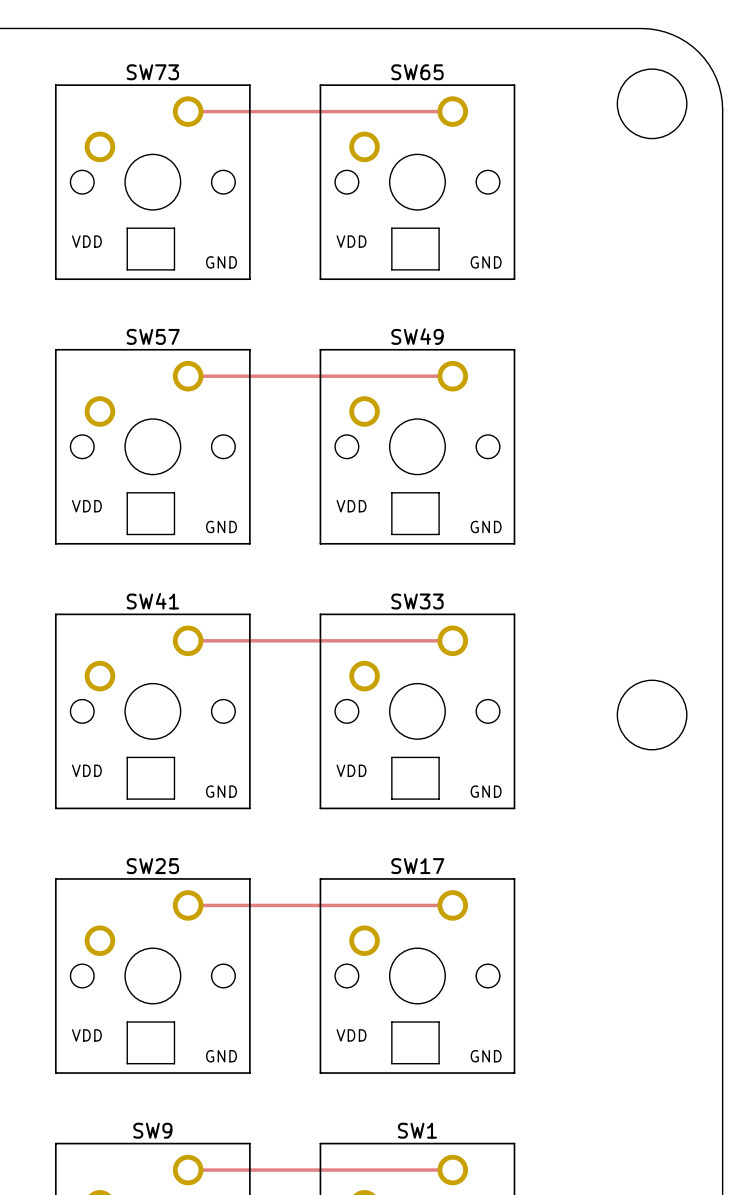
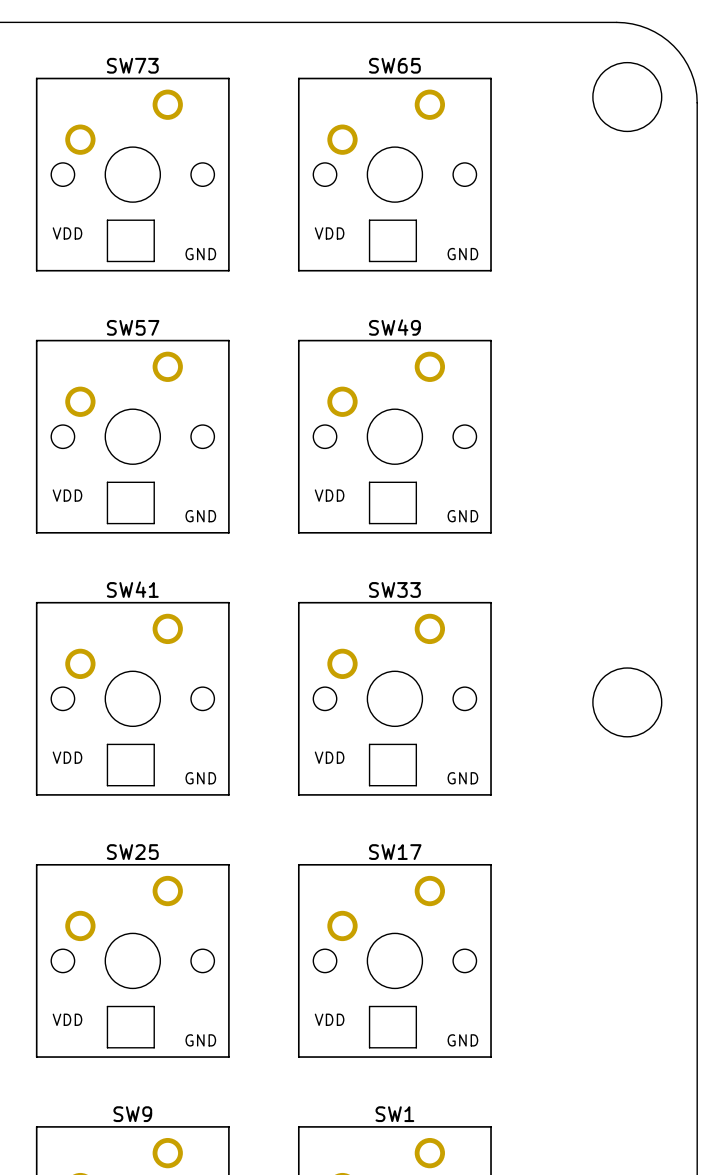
track: (188, 111) (452, 111) -> none
track: (188, 376) (452, 376) -> none
track: (188, 640) (452, 640) -> none
track: (188, 905) (452, 905) -> none
track: (188, 1170) (452, 1170) -> none

